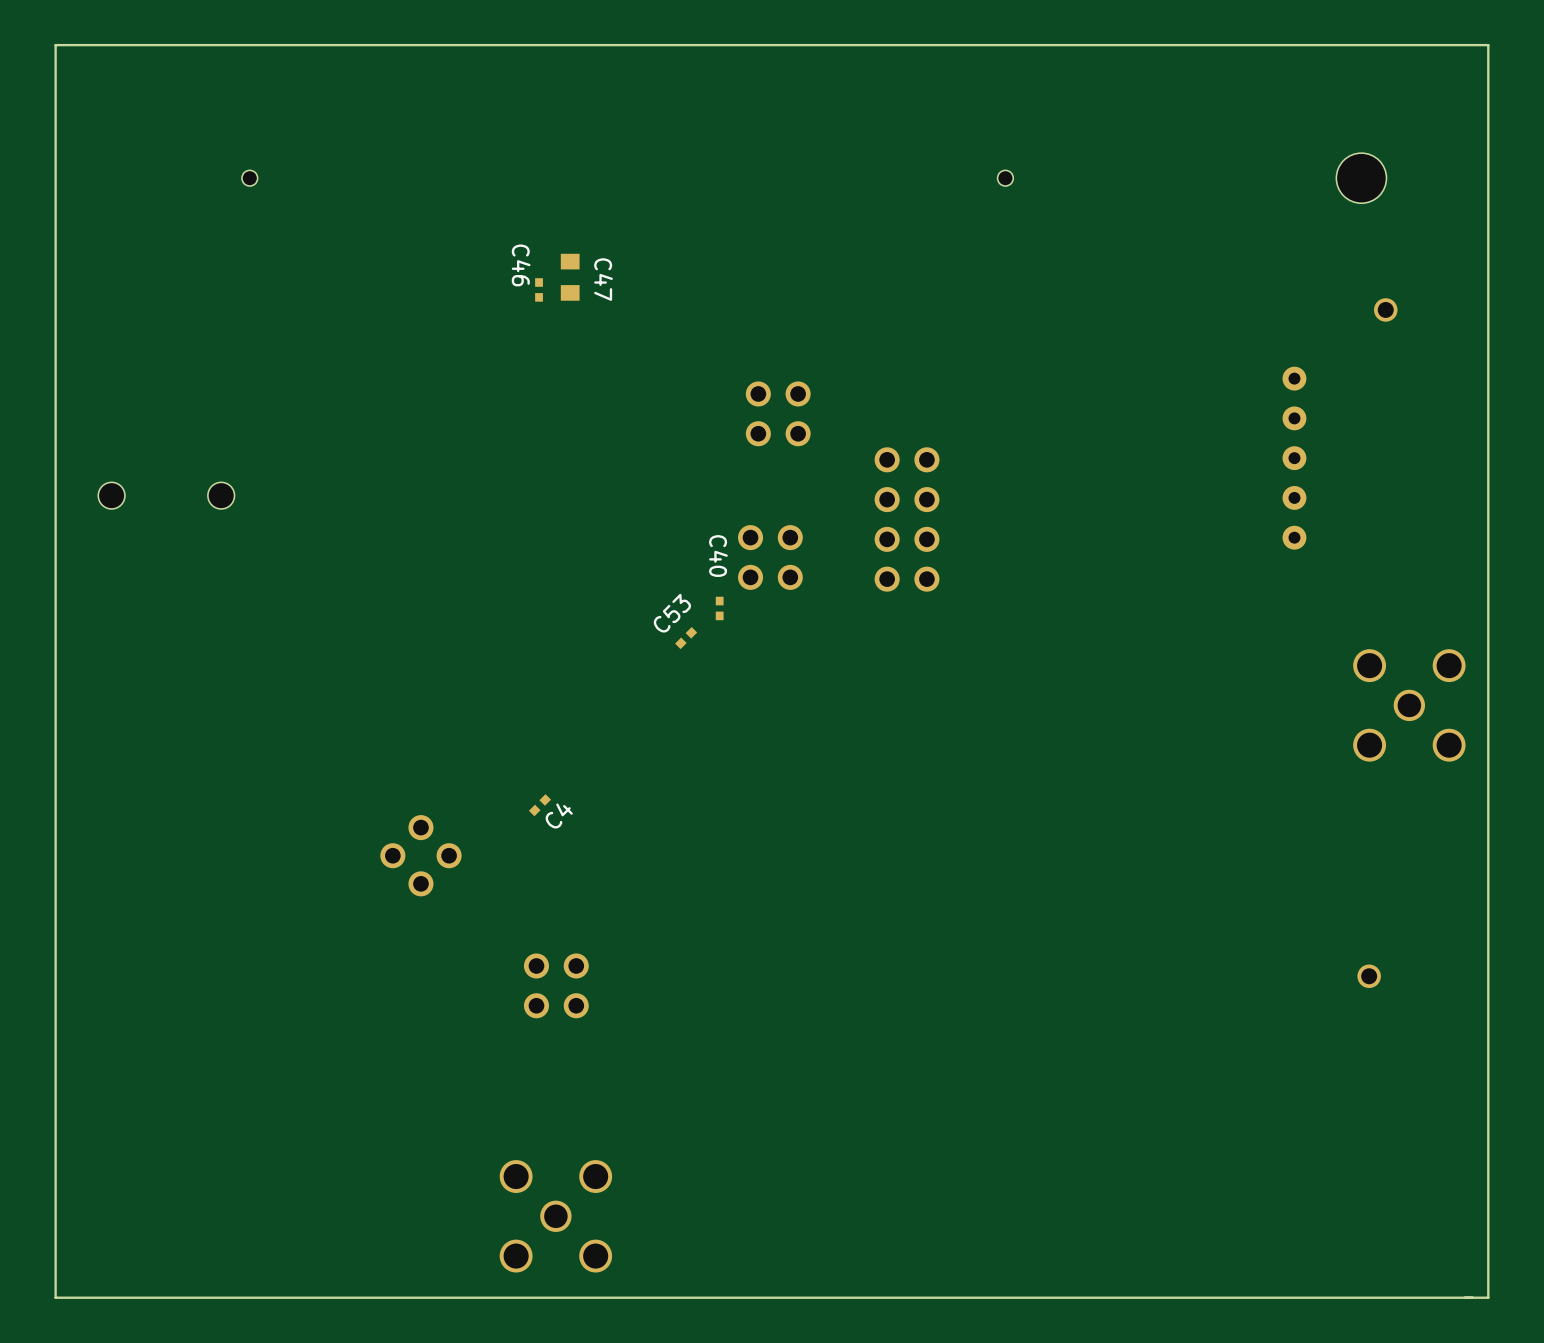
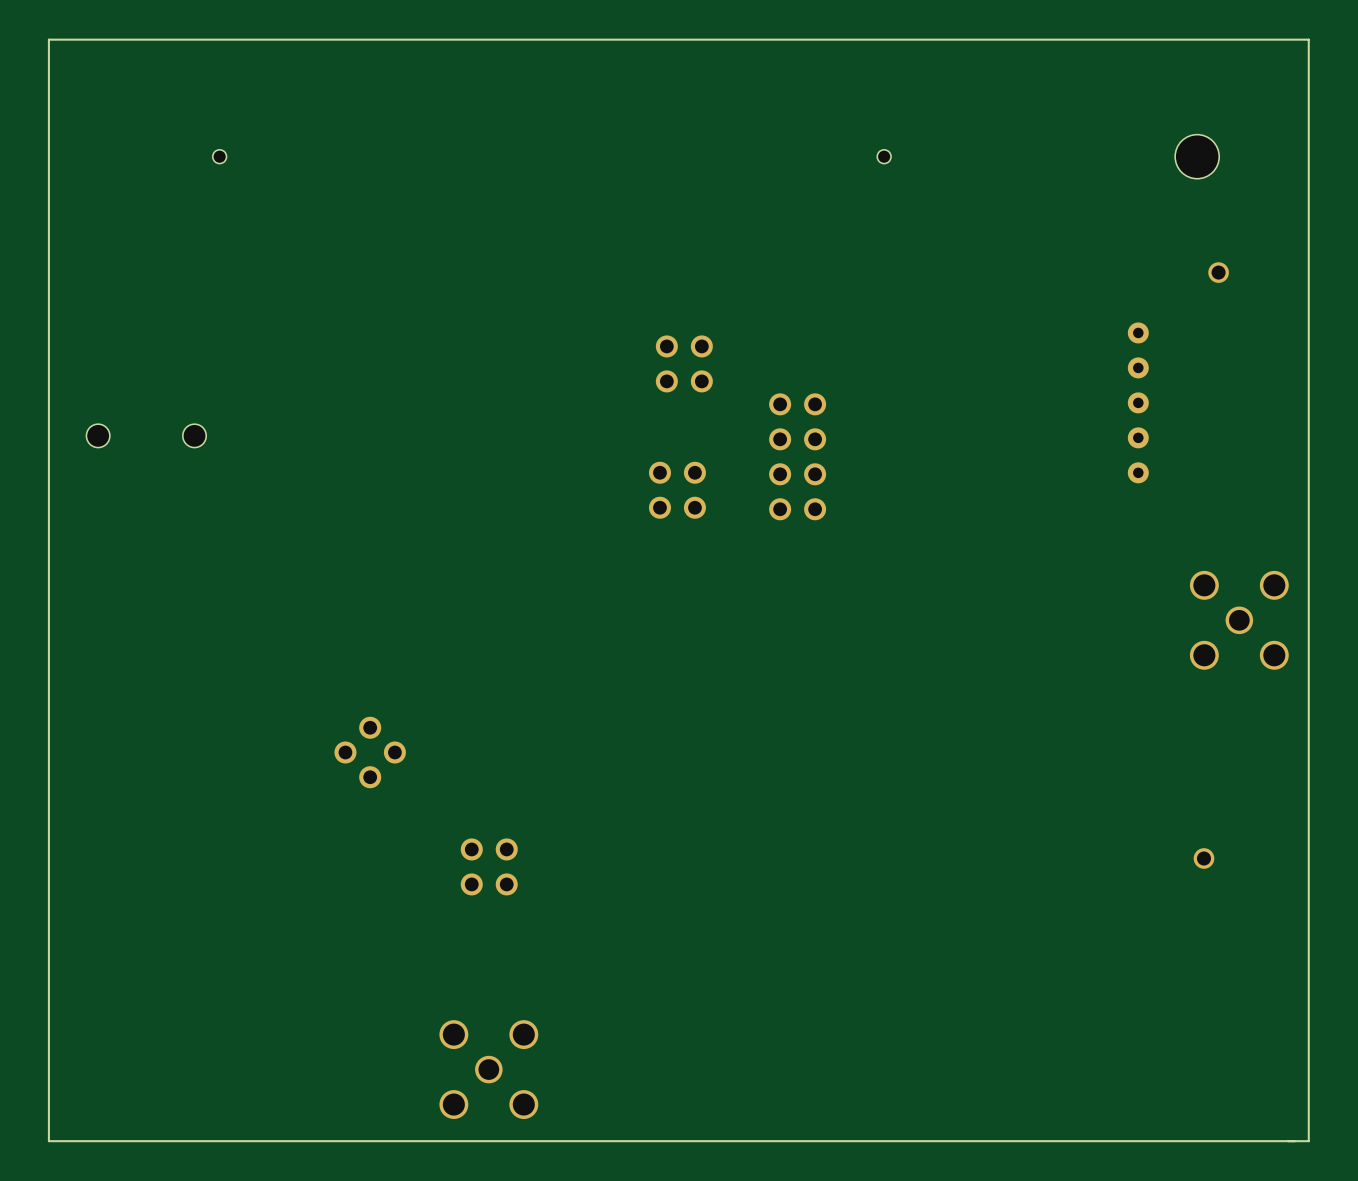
C47: (570, 277) -> none
C46: (539, 289) -> none
C40: (719, 608) -> none
C53: (686, 638) -> none
C4: (539, 805) -> none

